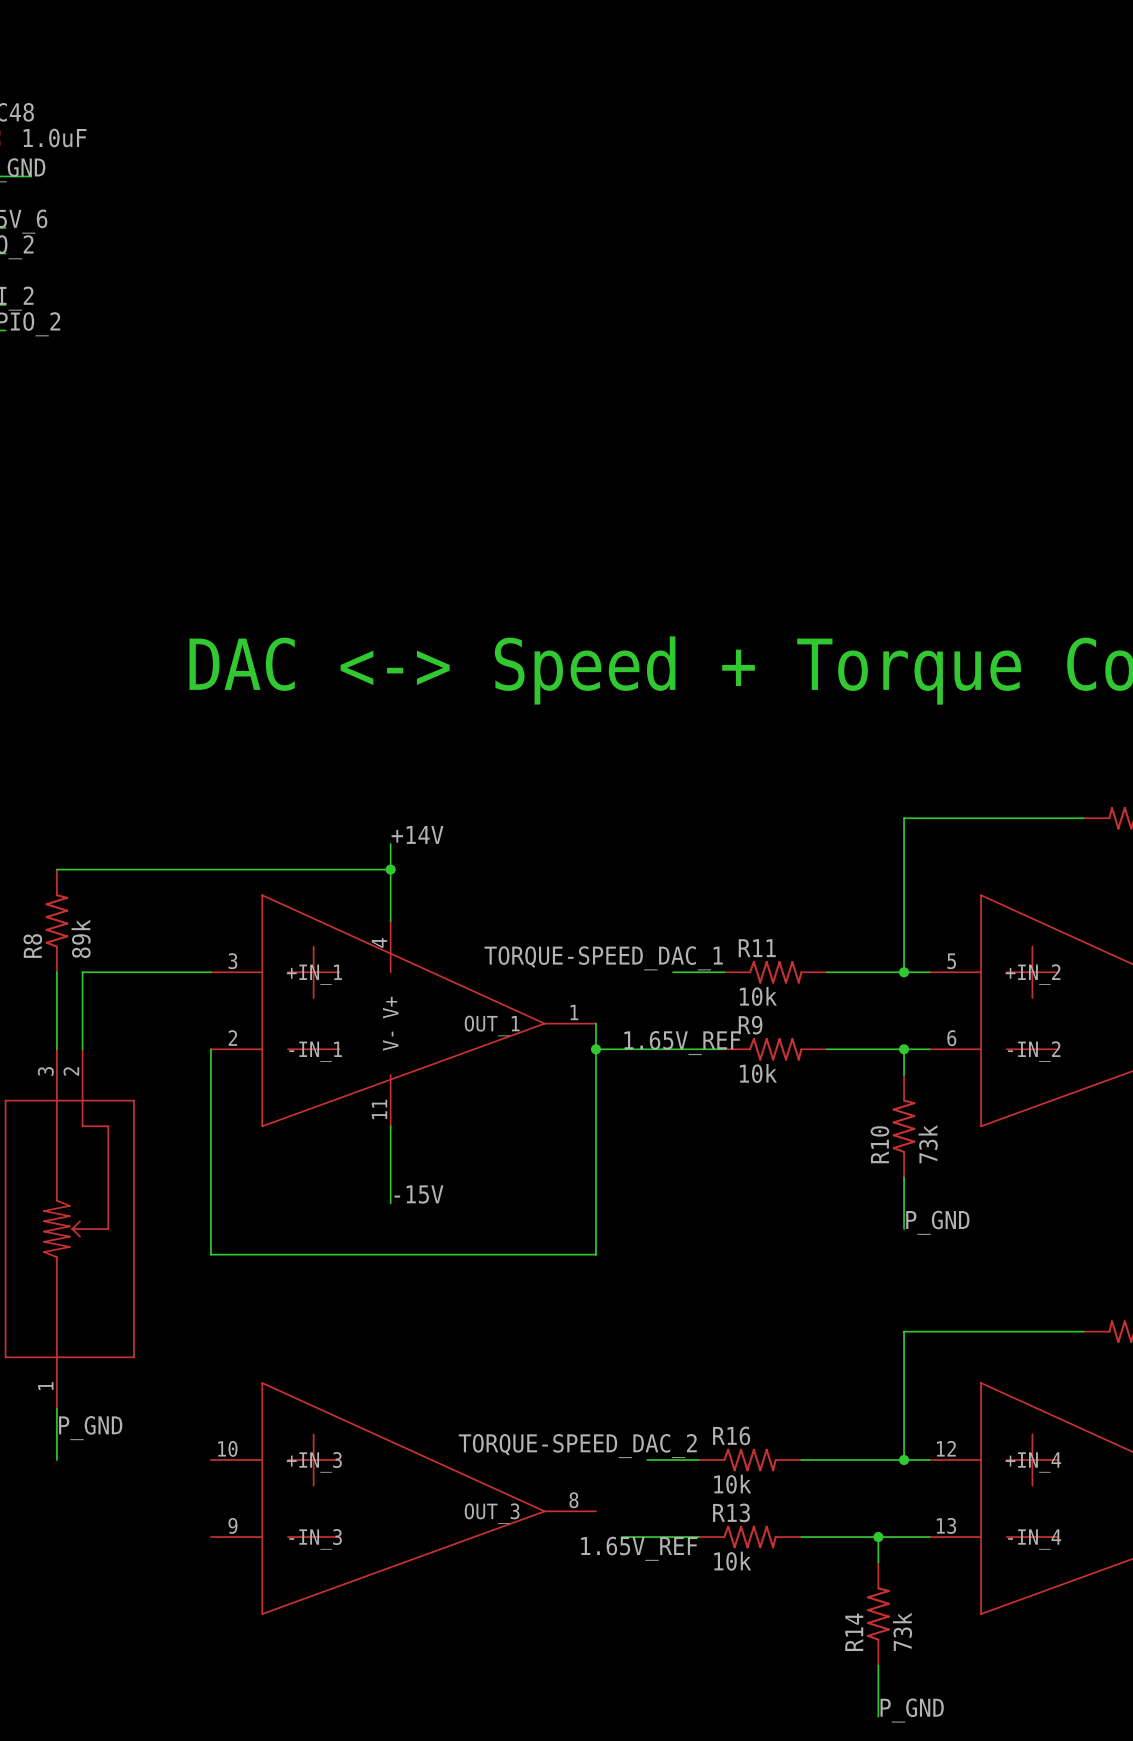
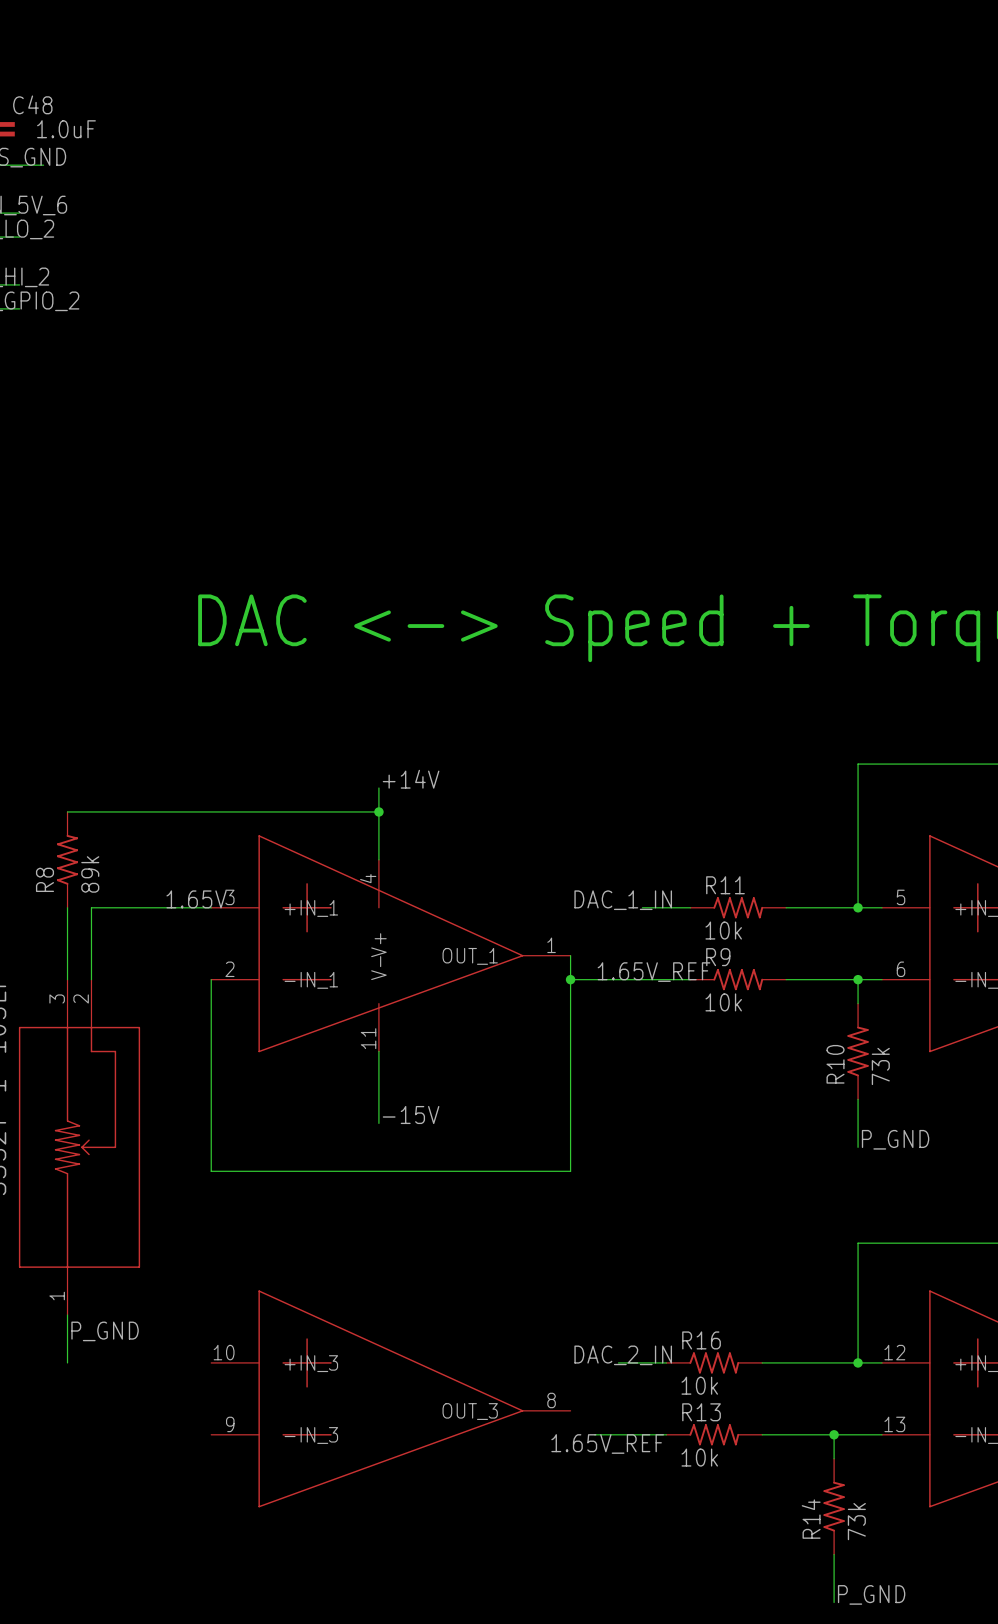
label: TORQUE-SPEED_DAC_1 (603, 958) -> none
label: none -> 1.65V (196, 899)
label: none -> DAC_1_IN (623, 900)
label: TORQUE-SPEED_DAC_2 (577, 1446) -> none
label: none -> DAC_2_IN (623, 1355)

